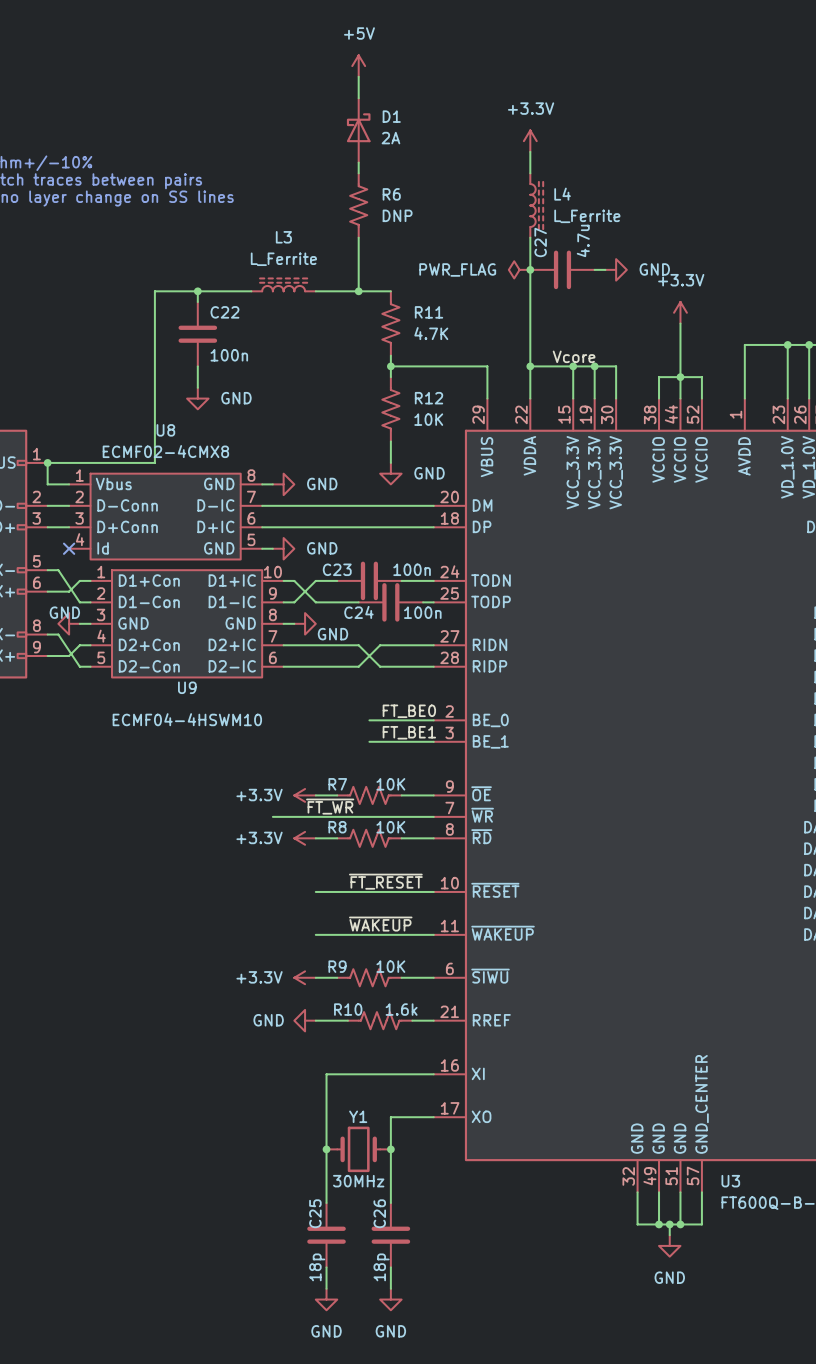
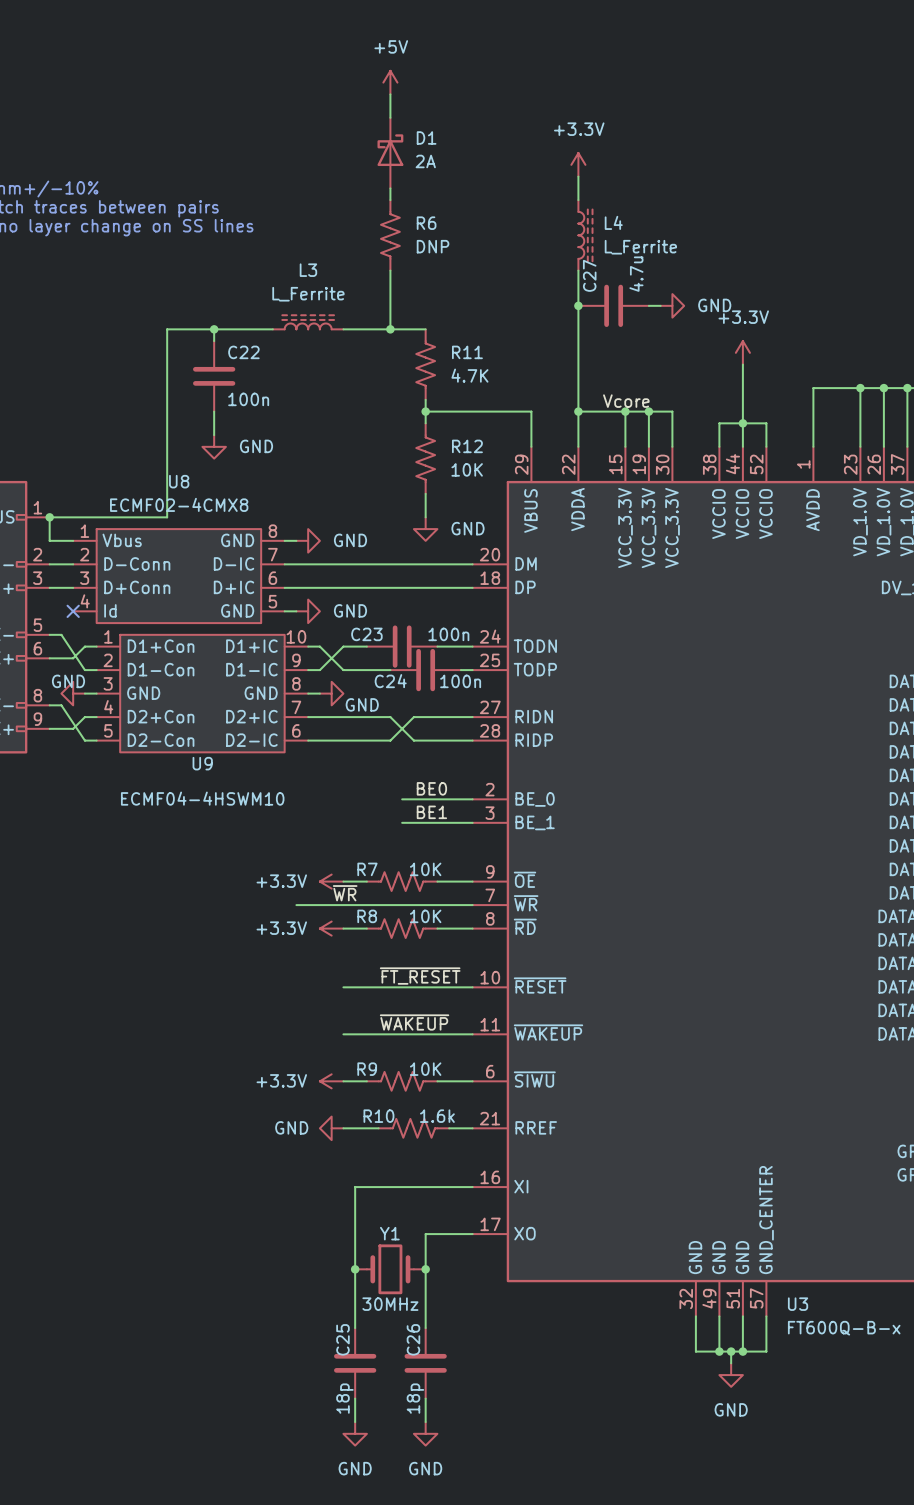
power symbol: PWR_FLAG (519, 269) -> none
label: FT_BE0 (409, 711) -> BE0 (431, 788)
label: FT_BE1 (409, 732) -> BE1 (431, 812)
label: ~{FT_WR} (330, 806) -> ~{WR} (345, 893)

